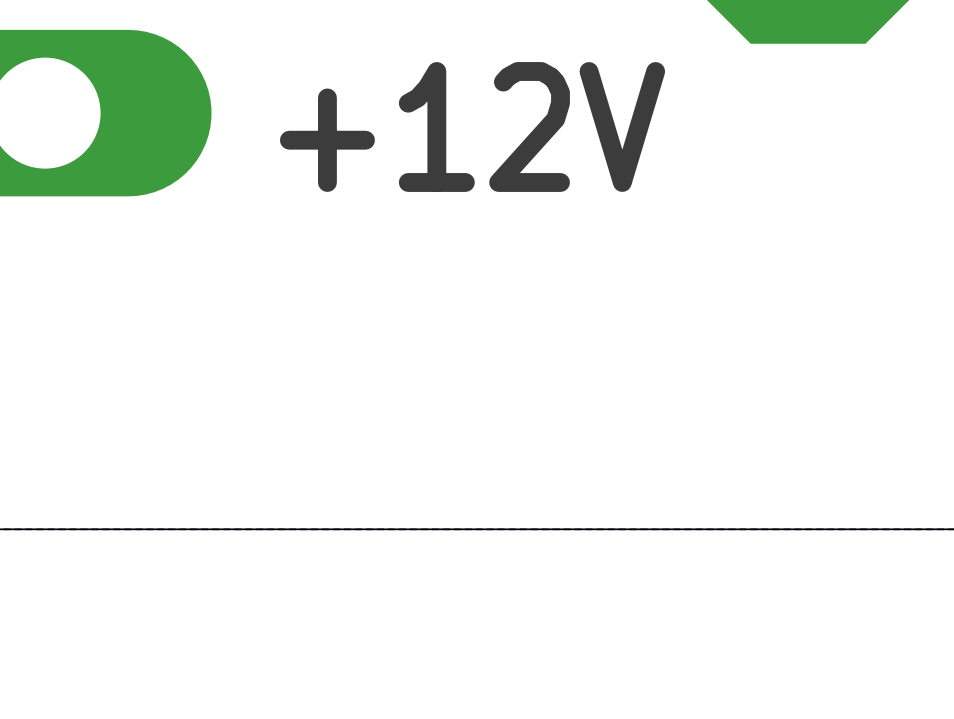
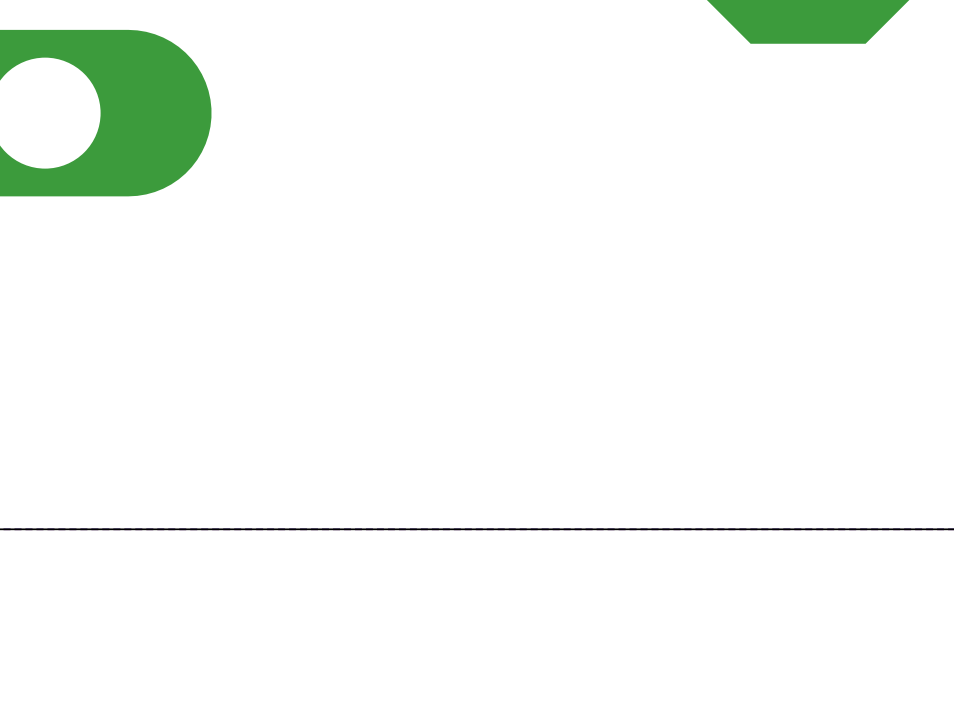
text: +12V (472, 126) -> none

